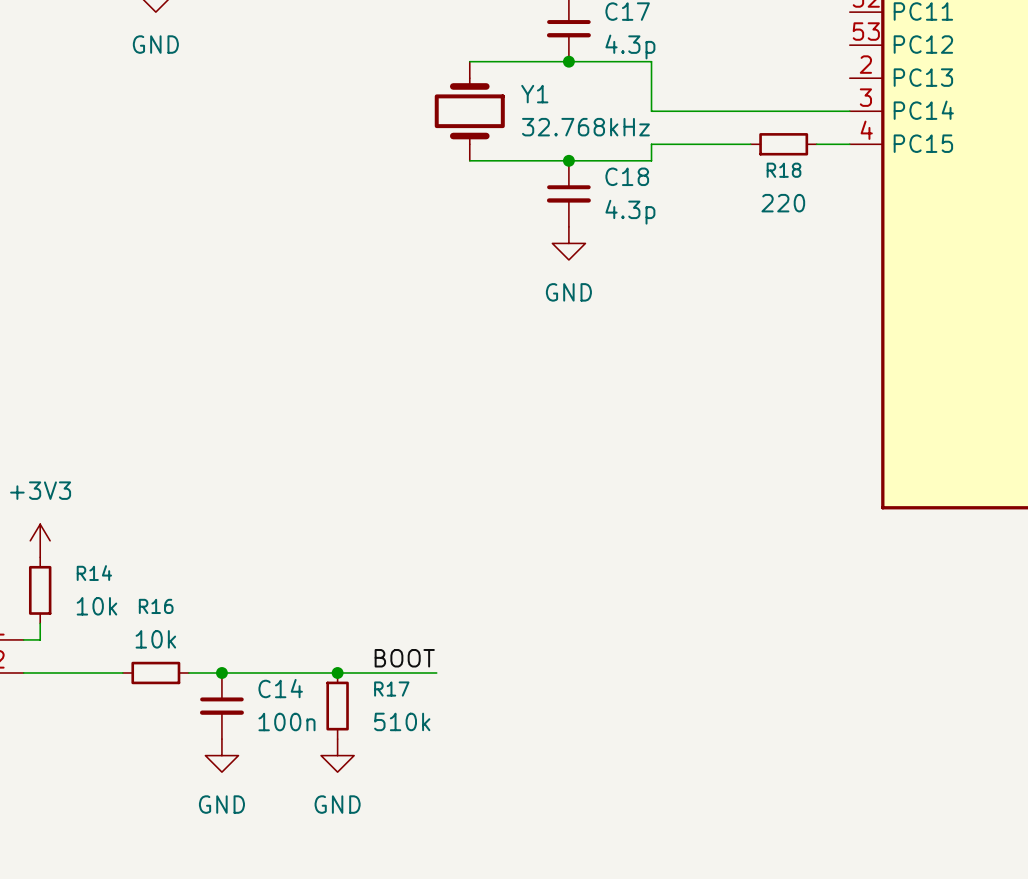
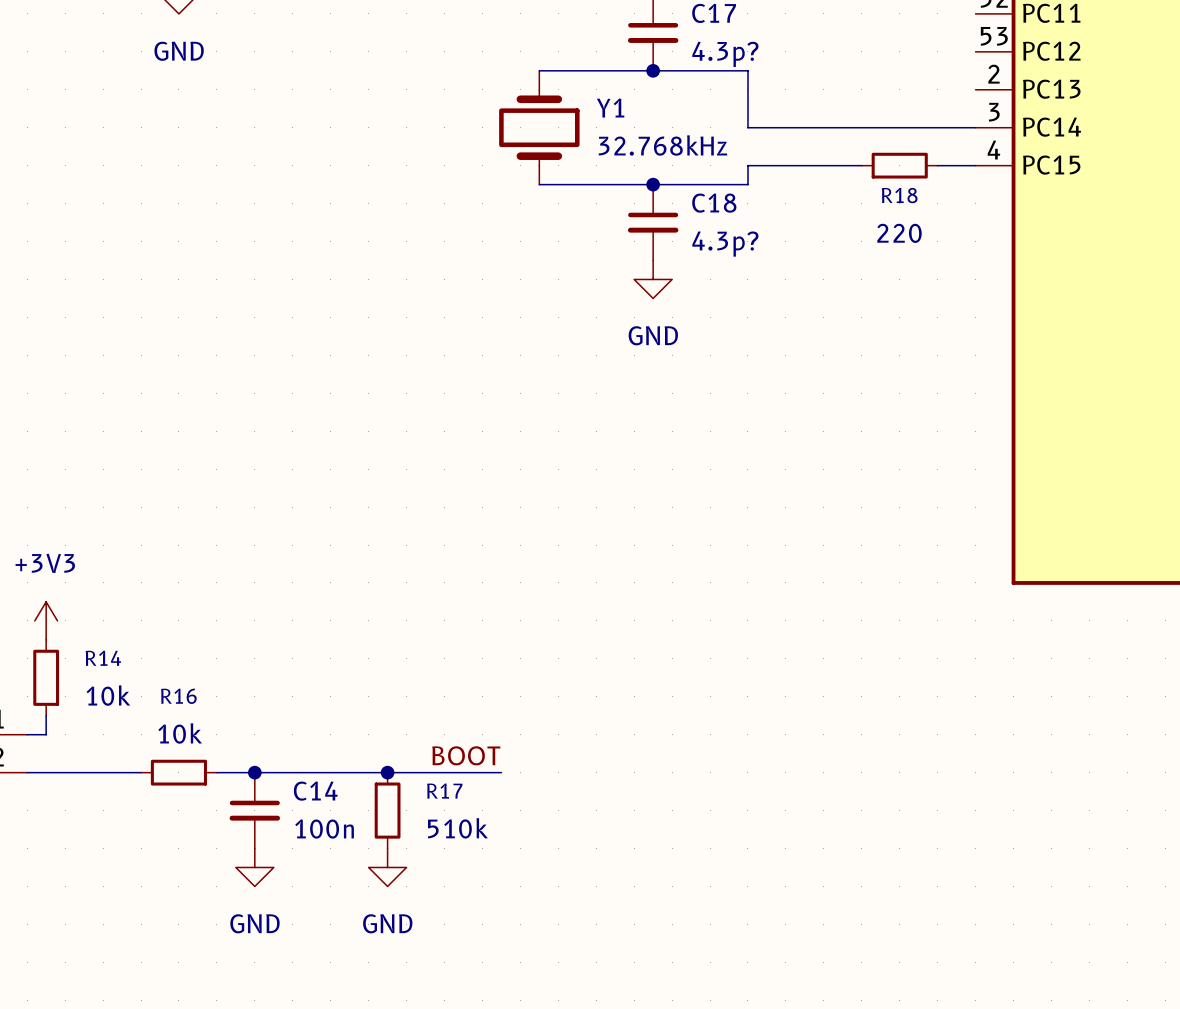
C17 value: 4.3p (630, 46) -> 4.3p? (725, 54)
C18 value: 4.3p (630, 212) -> 4.3p? (725, 244)

